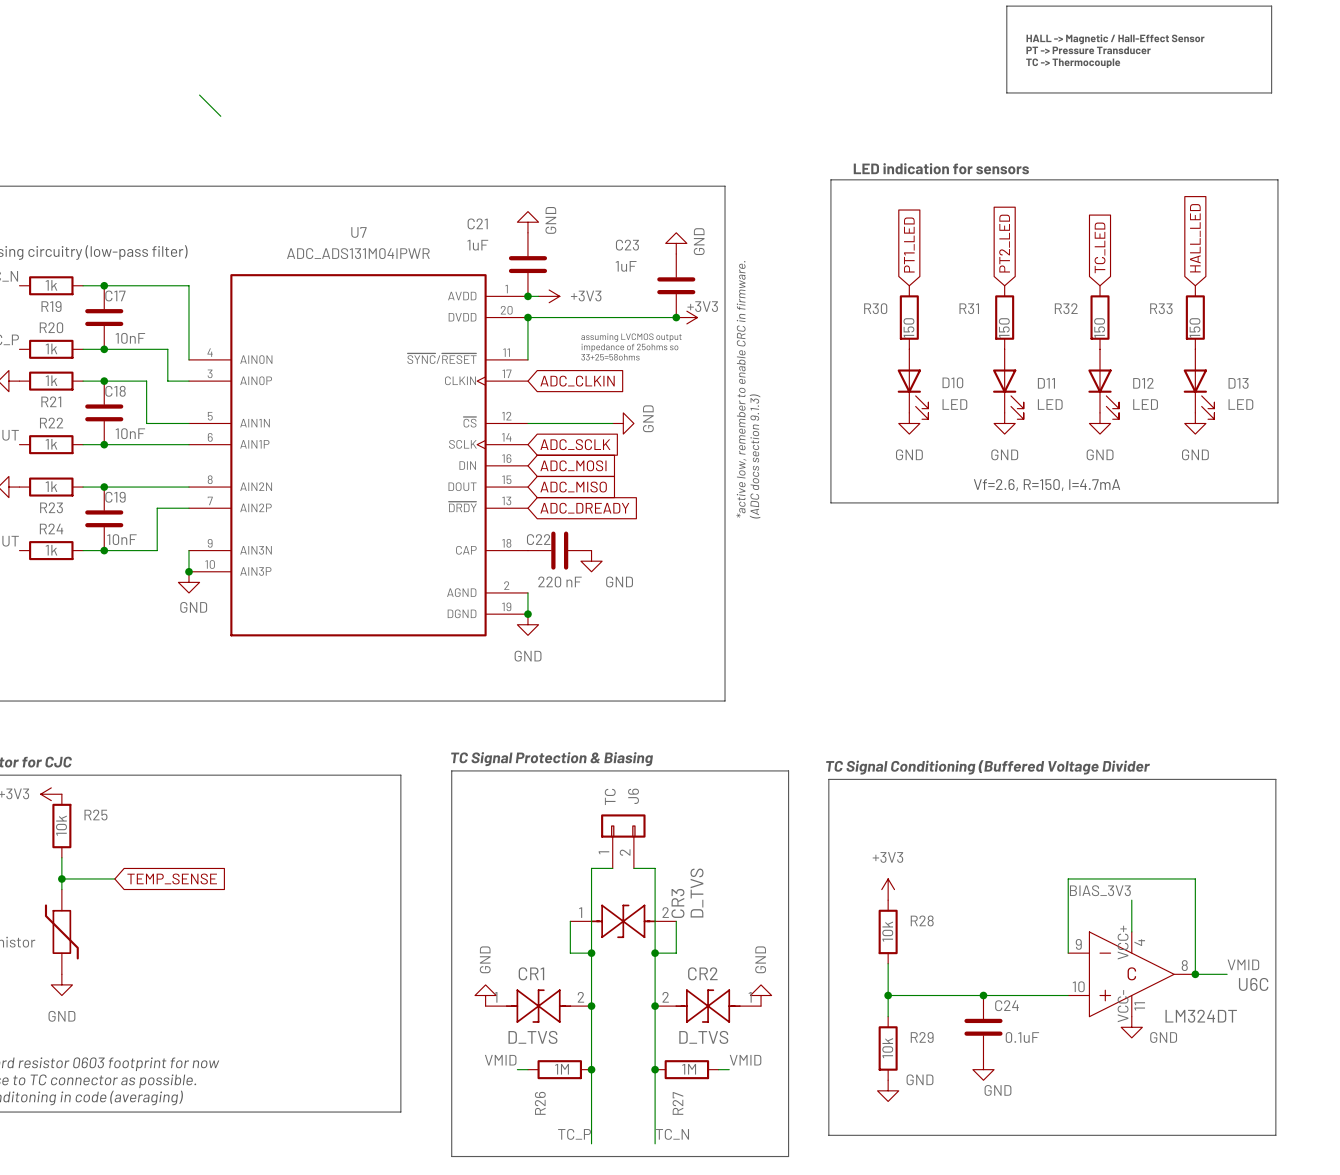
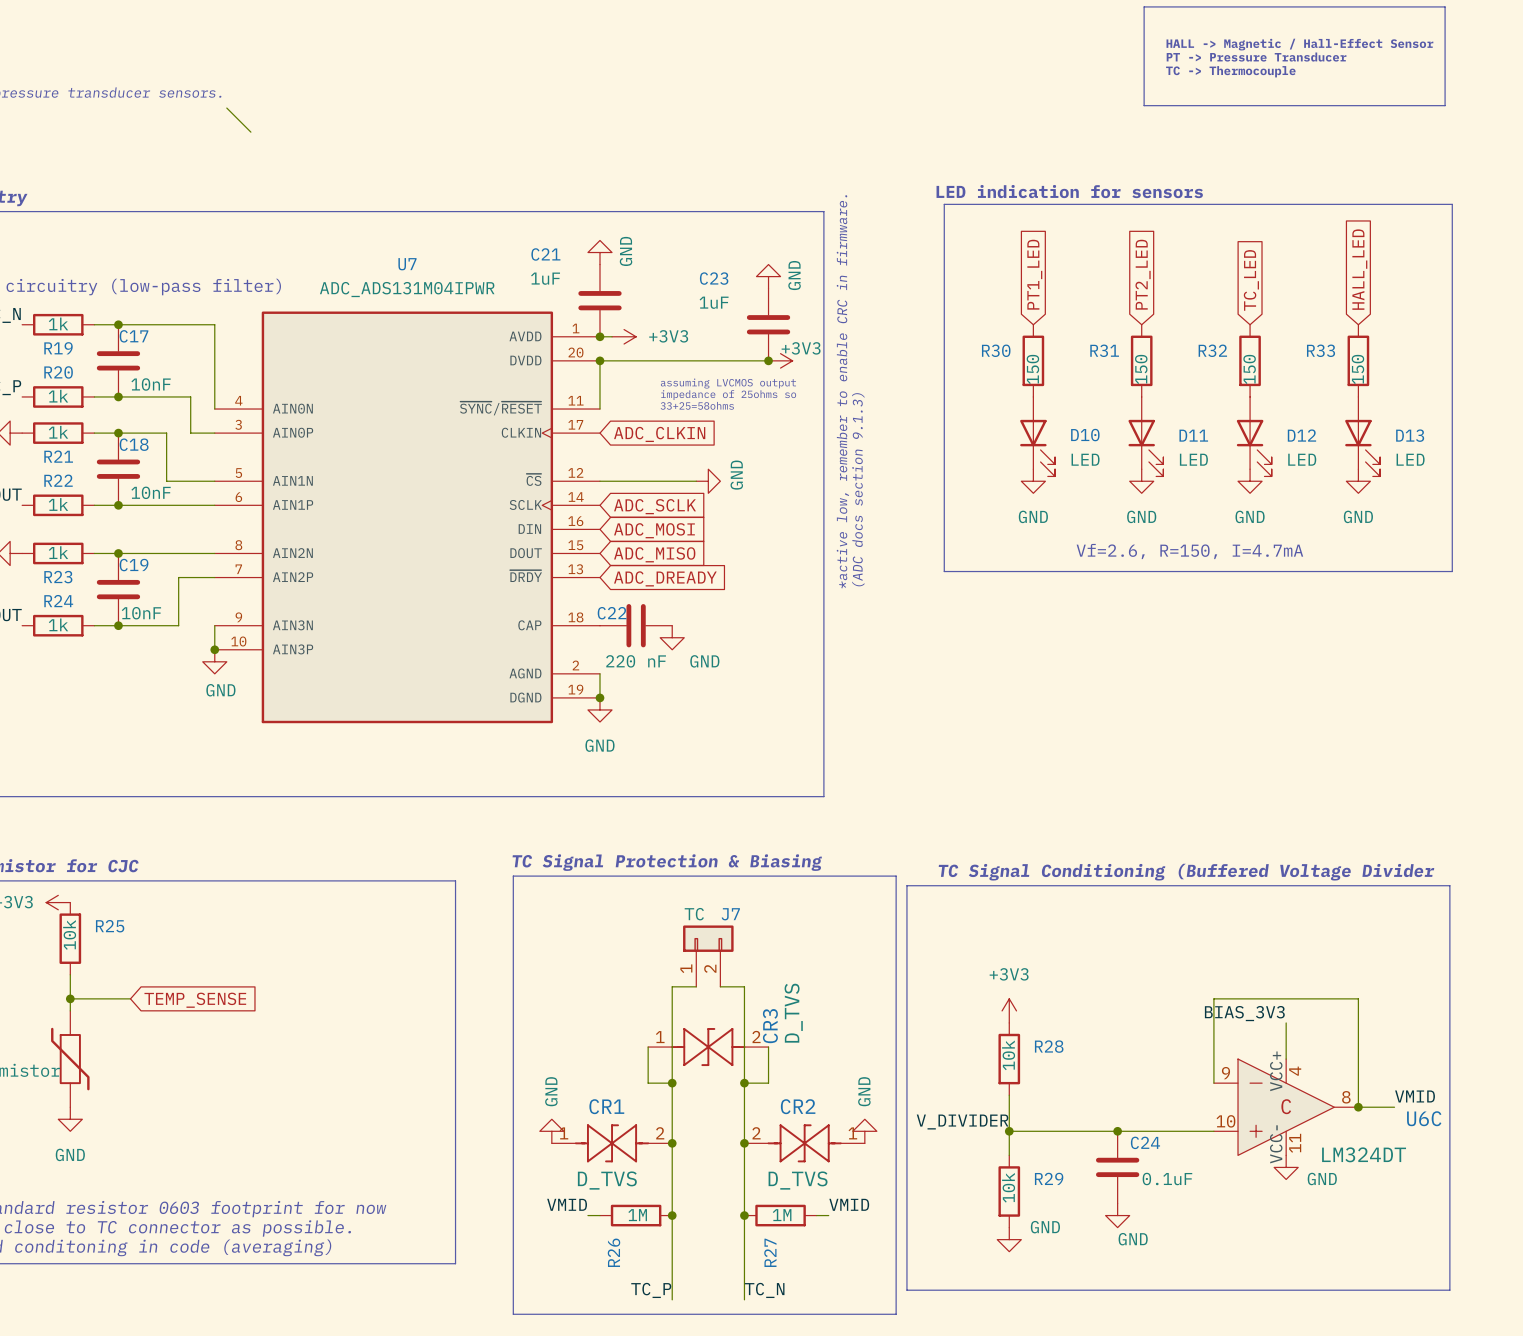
line: (828, 779) (828, 1135) -> (941, 885) (906, 885) (906, 1290) (941, 1290)
J6 value rotation: 0° (610, 796) -> 90° clockwise (694, 914)
J6 name: J6 (633, 796) -> J7 (730, 914)
label: none -> V_DIVIDER (962, 1122)

